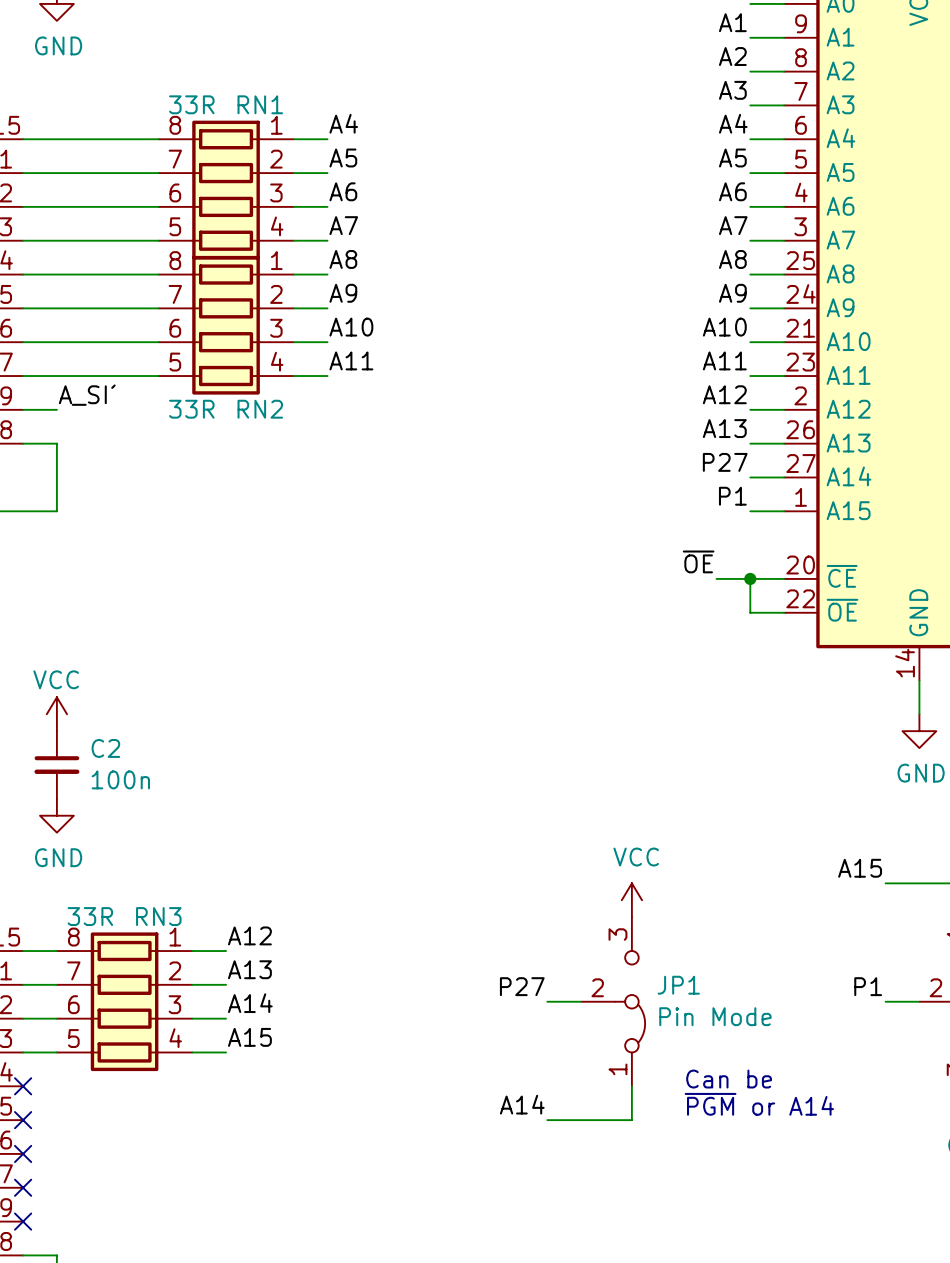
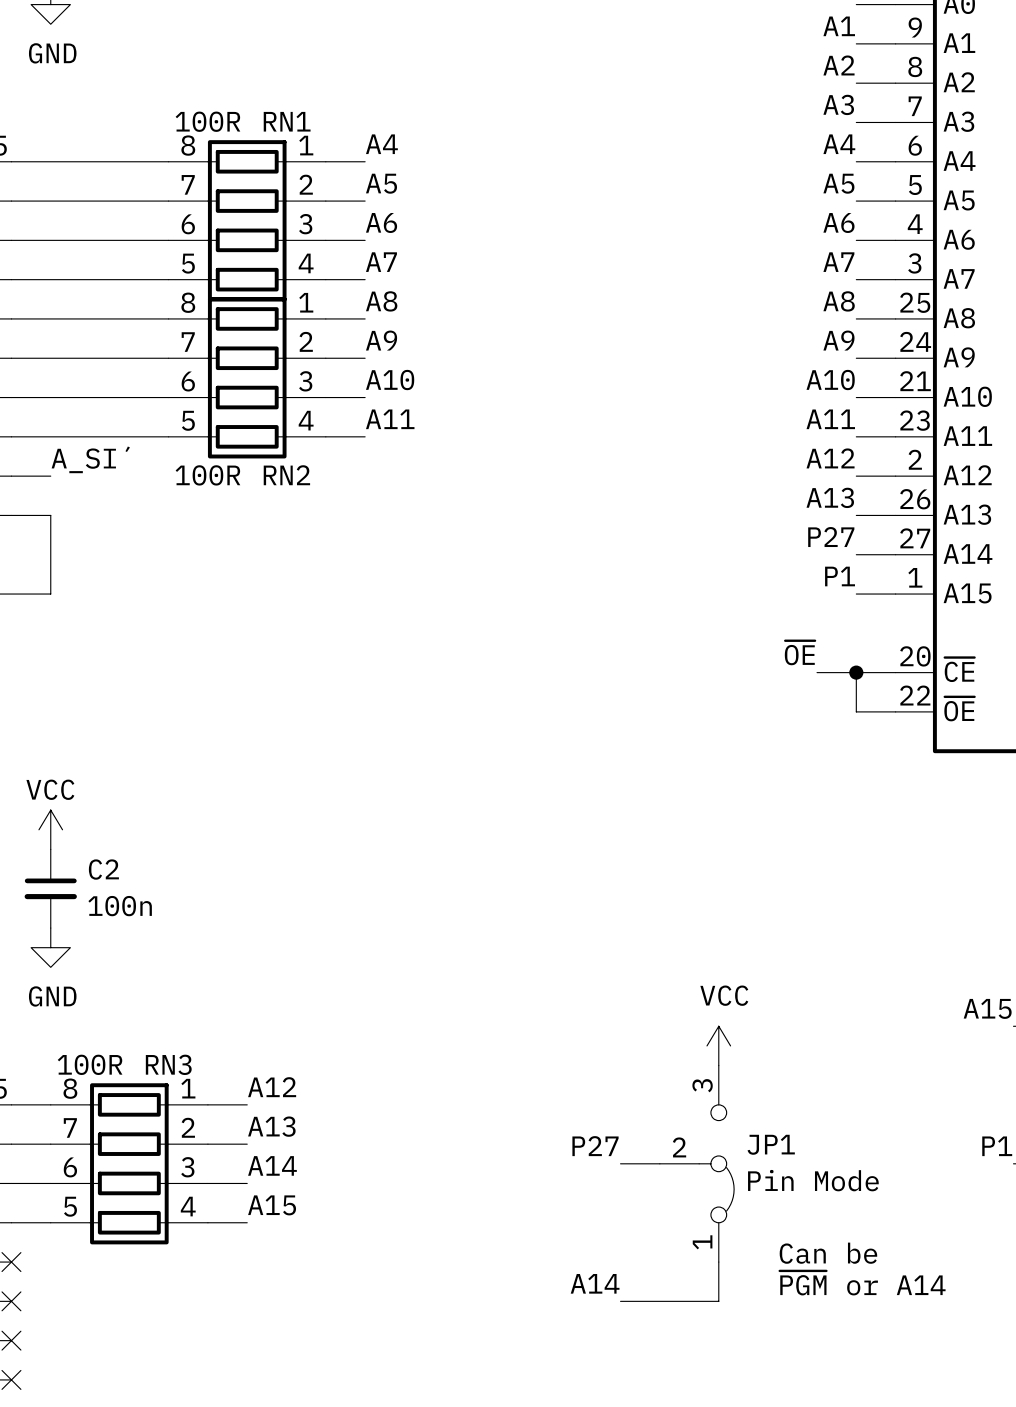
RN1 value: 33R (191, 104) -> 100R (207, 121)
RN2 value: 33R (191, 409) -> 100R (207, 475)
RN3 value: 33R (90, 916) -> 100R (90, 1064)

